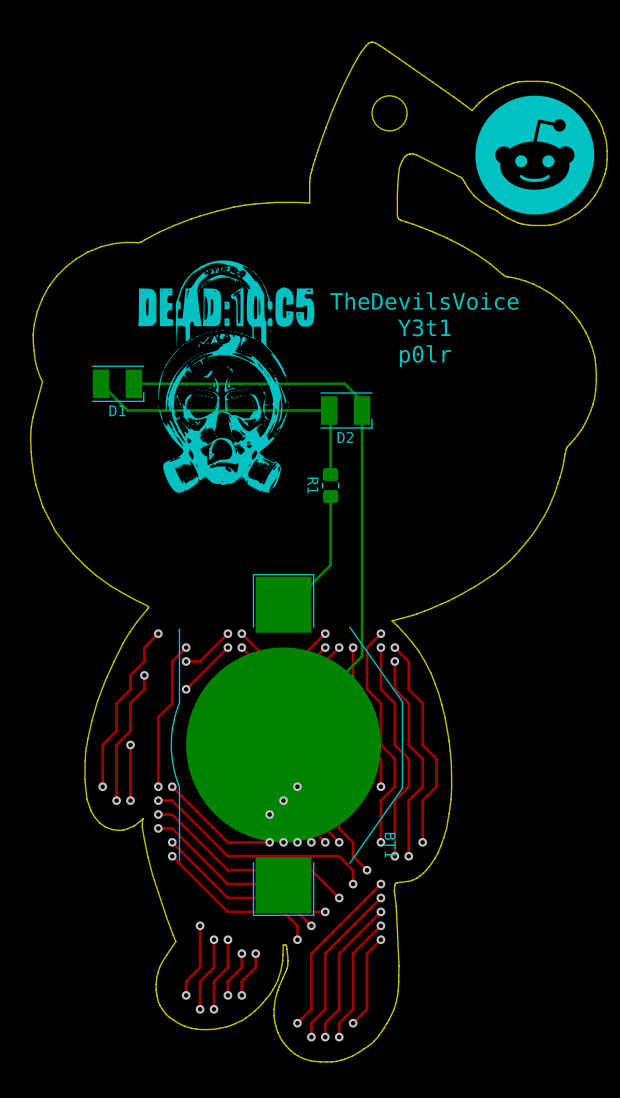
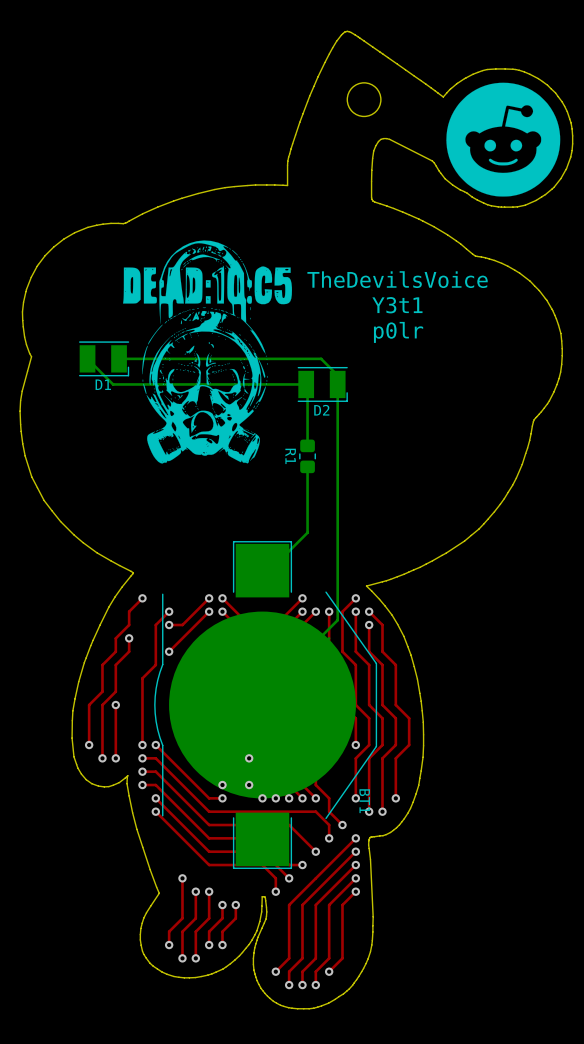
via: (297, 786) -> none
via: none -> (249, 758)
via: (283, 800) -> none
via: (269, 814) -> none
via: none -> (222, 785)
via: none -> (249, 785)
via: none -> (222, 798)
top track: (269, 842) (241, 842) -> none
via: (269, 842) -> none

